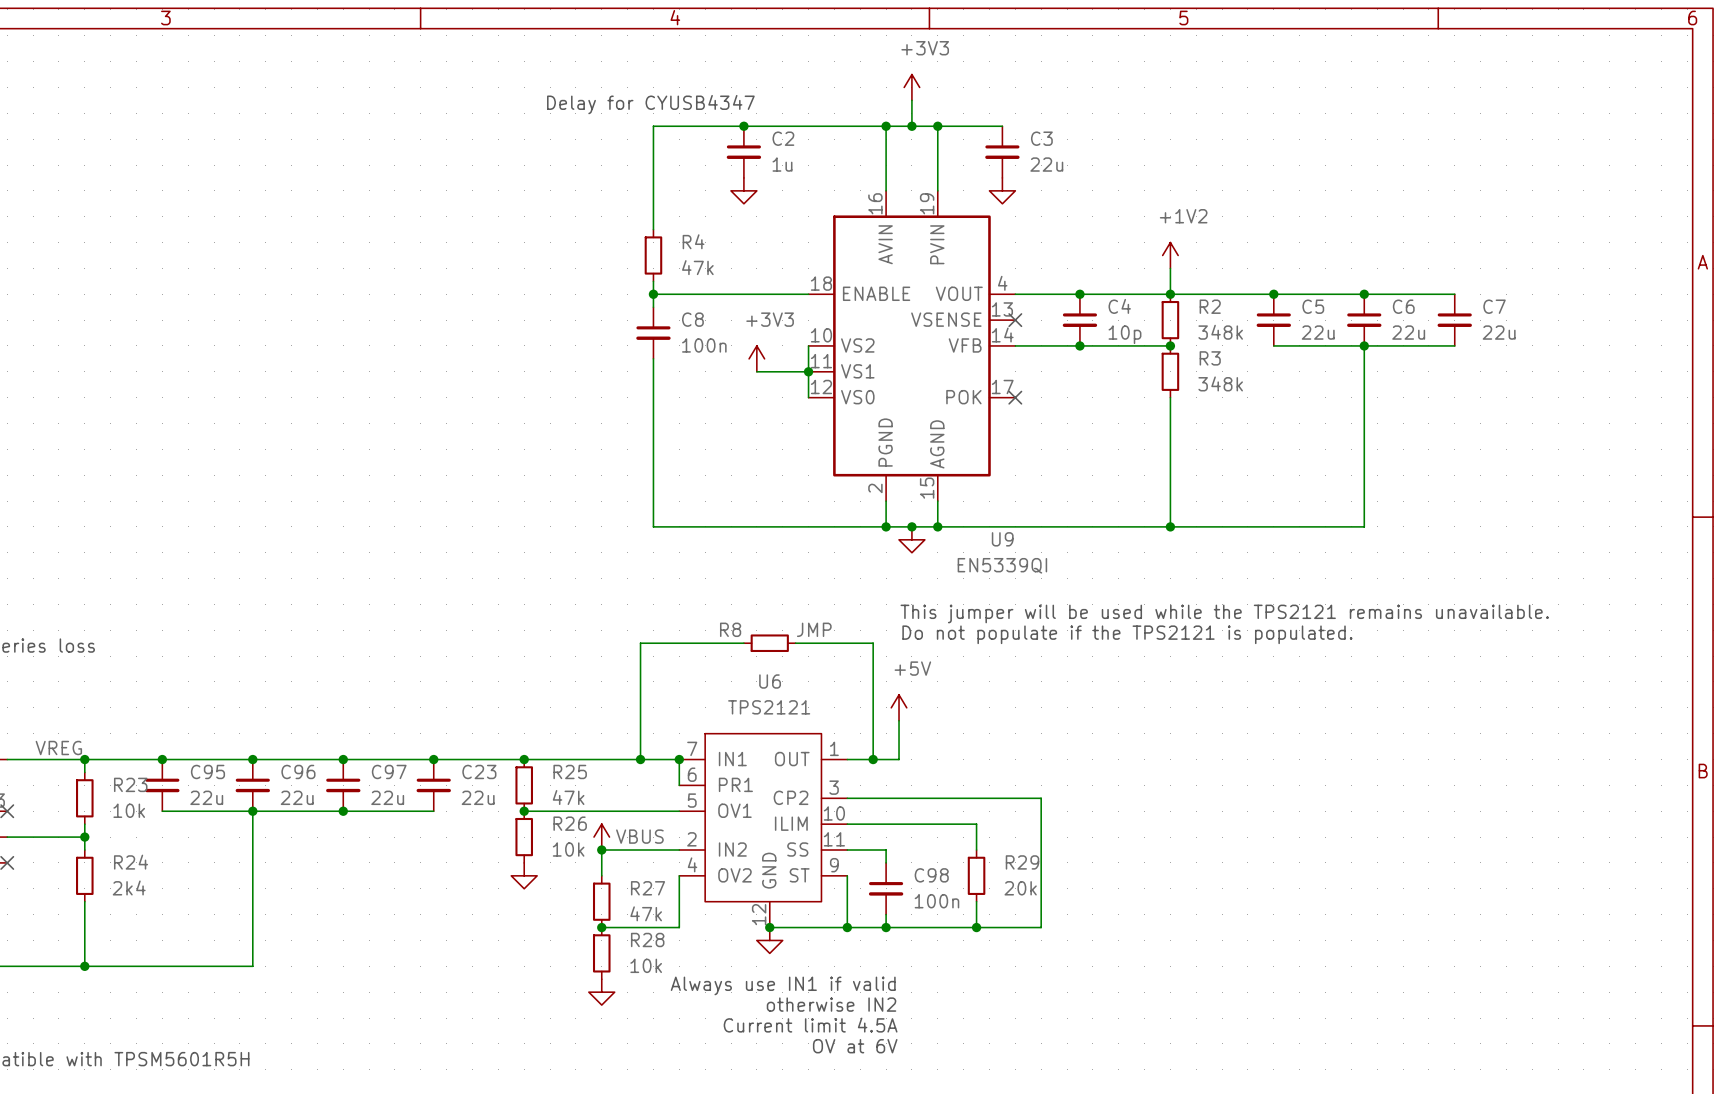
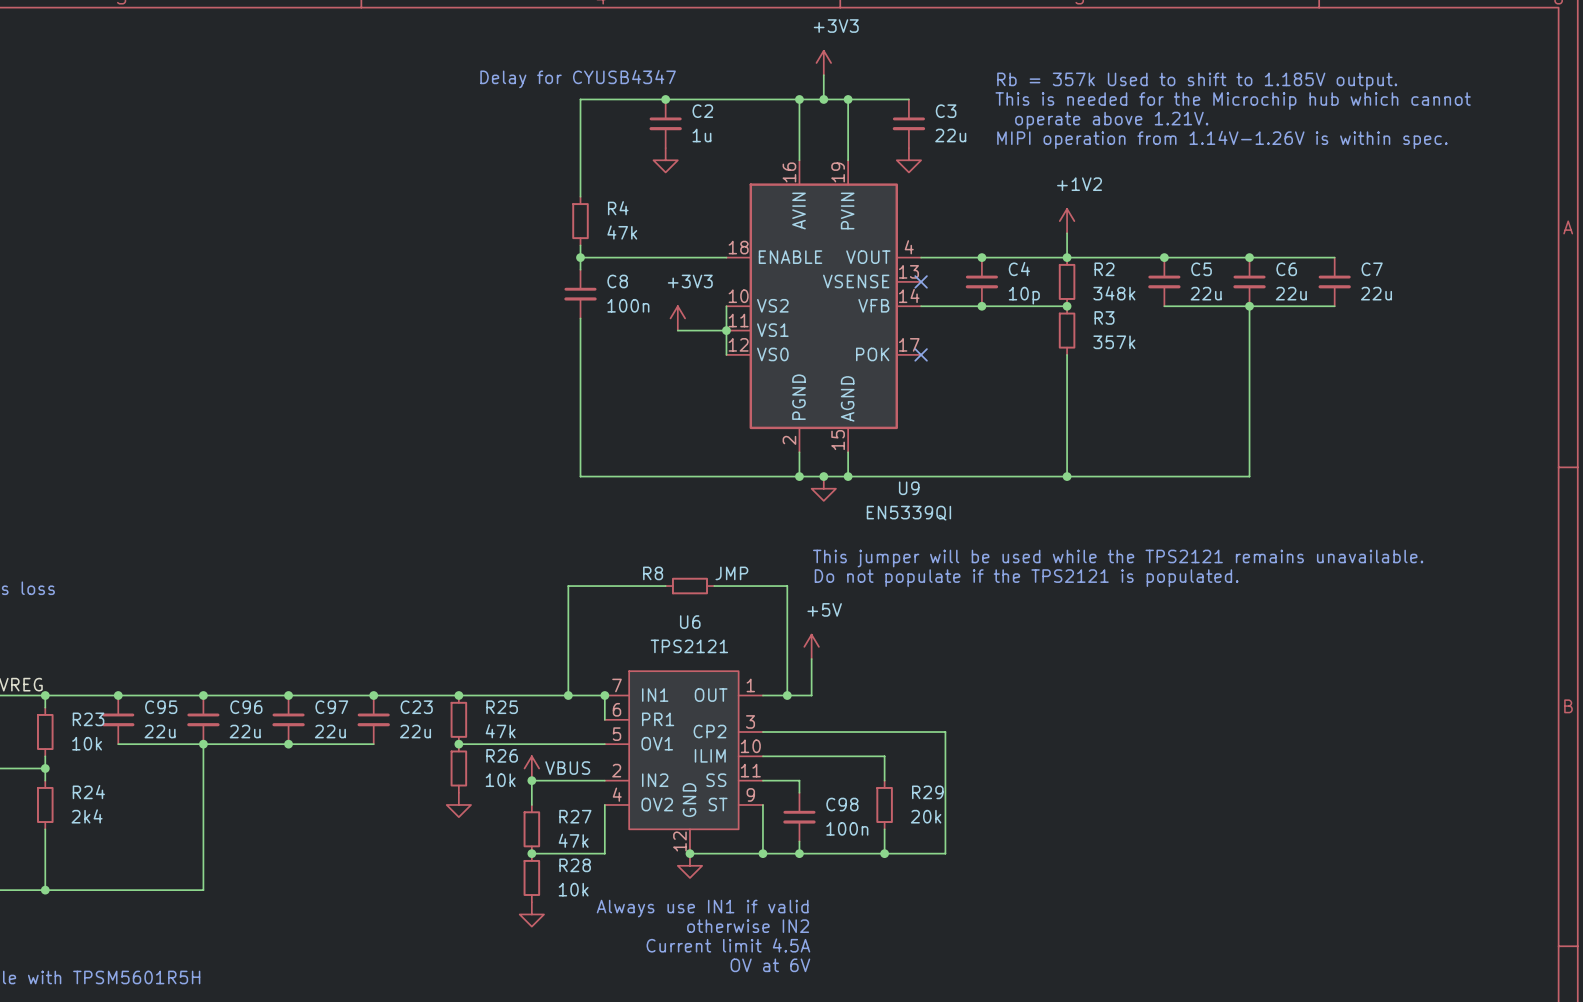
text: none -> Rb = 357k Used to shift to 1.185V output. (1197, 81)
text: none -> This is needed for the Microchip hub which cannot (1233, 101)
text: none -> operate above 1.21V. (1111, 120)
text: none -> MIPI operation from 1.14V-1.26V is within spec. (1222, 139)
R3 value: 348k (1220, 383) -> 357k (1114, 342)

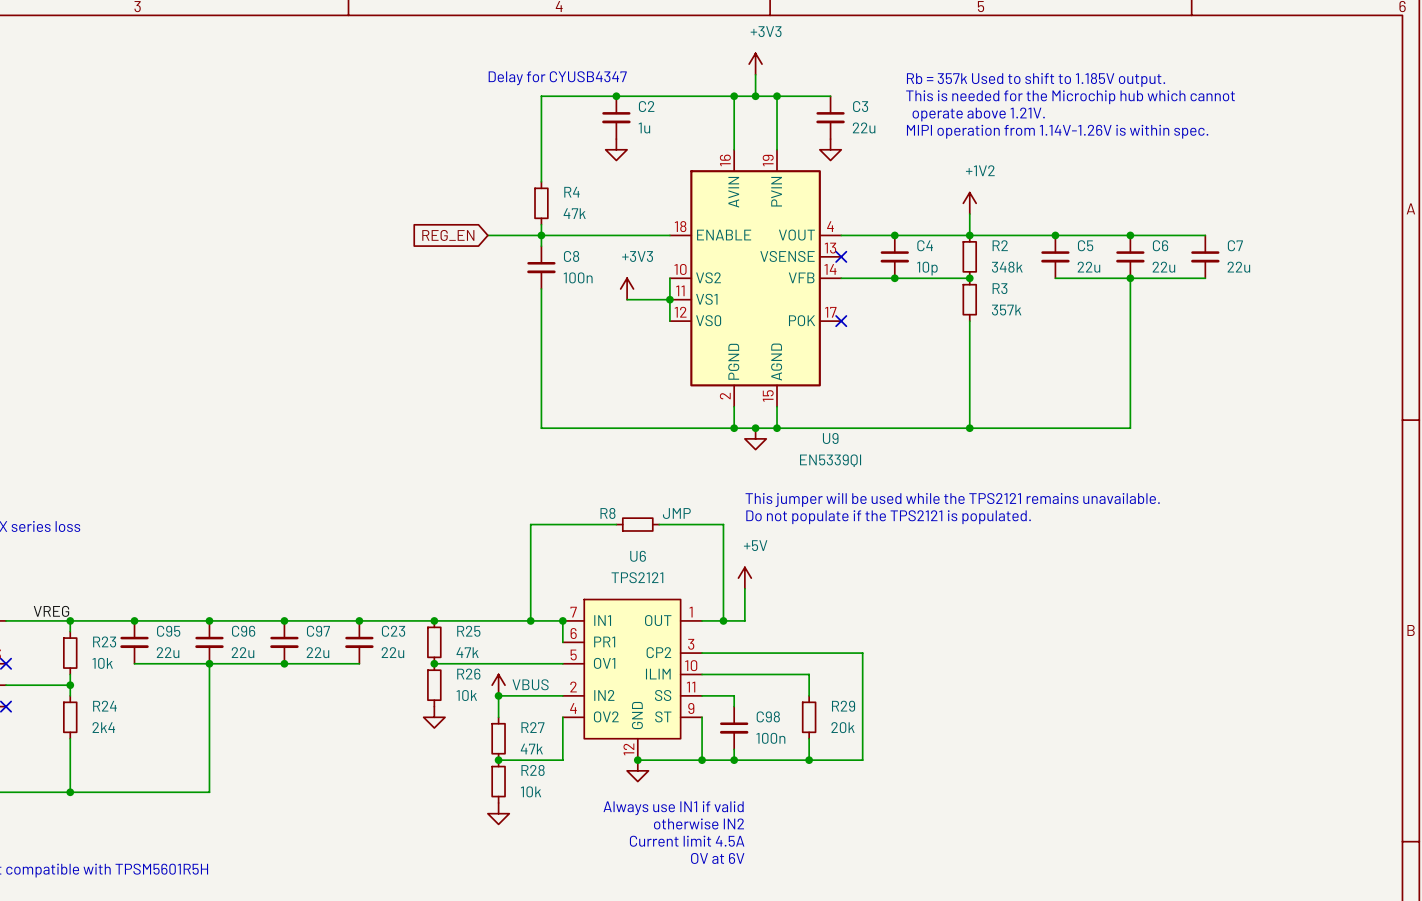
wire: none -> (487, 235) (541, 235)
global label: none -> REG_EN (448, 235)

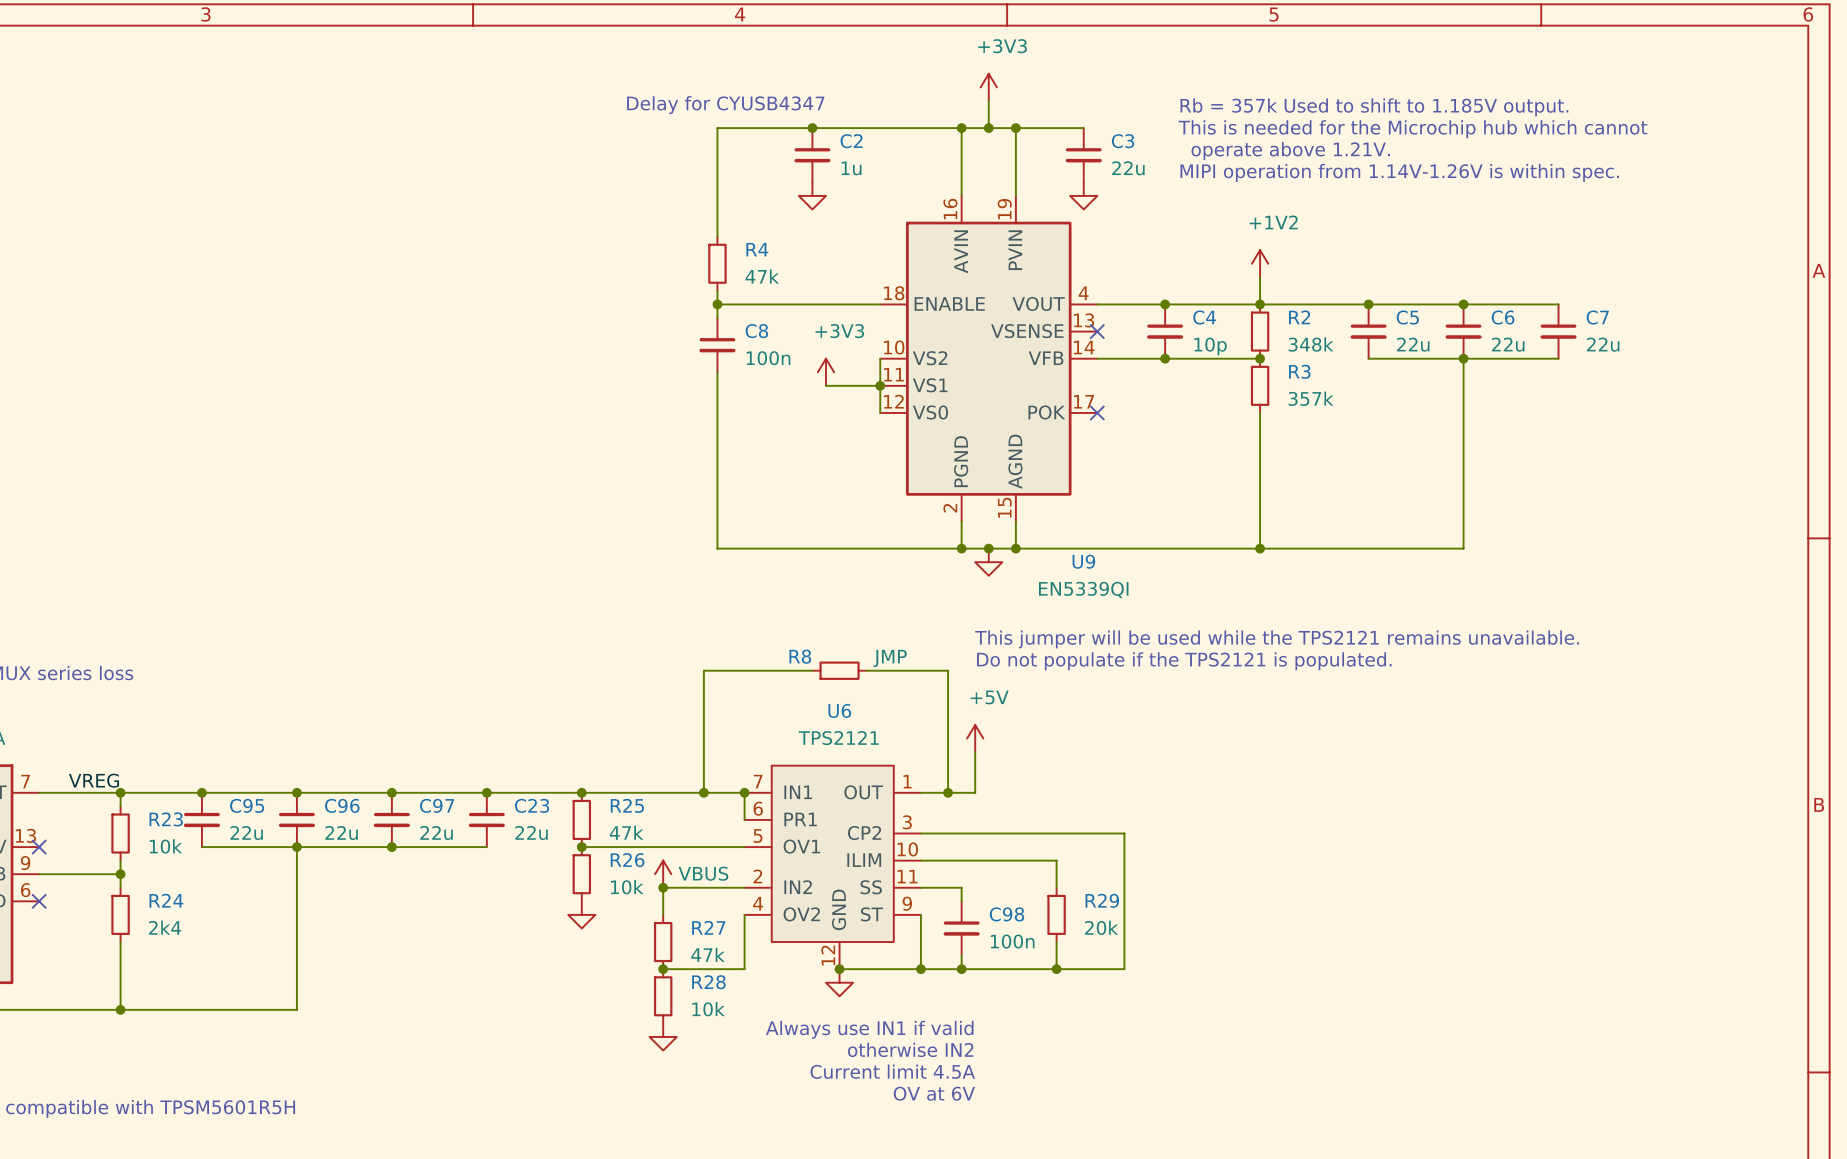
global label: REG_EN (448, 235) -> none
wire: (487, 235) (541, 235) -> none

